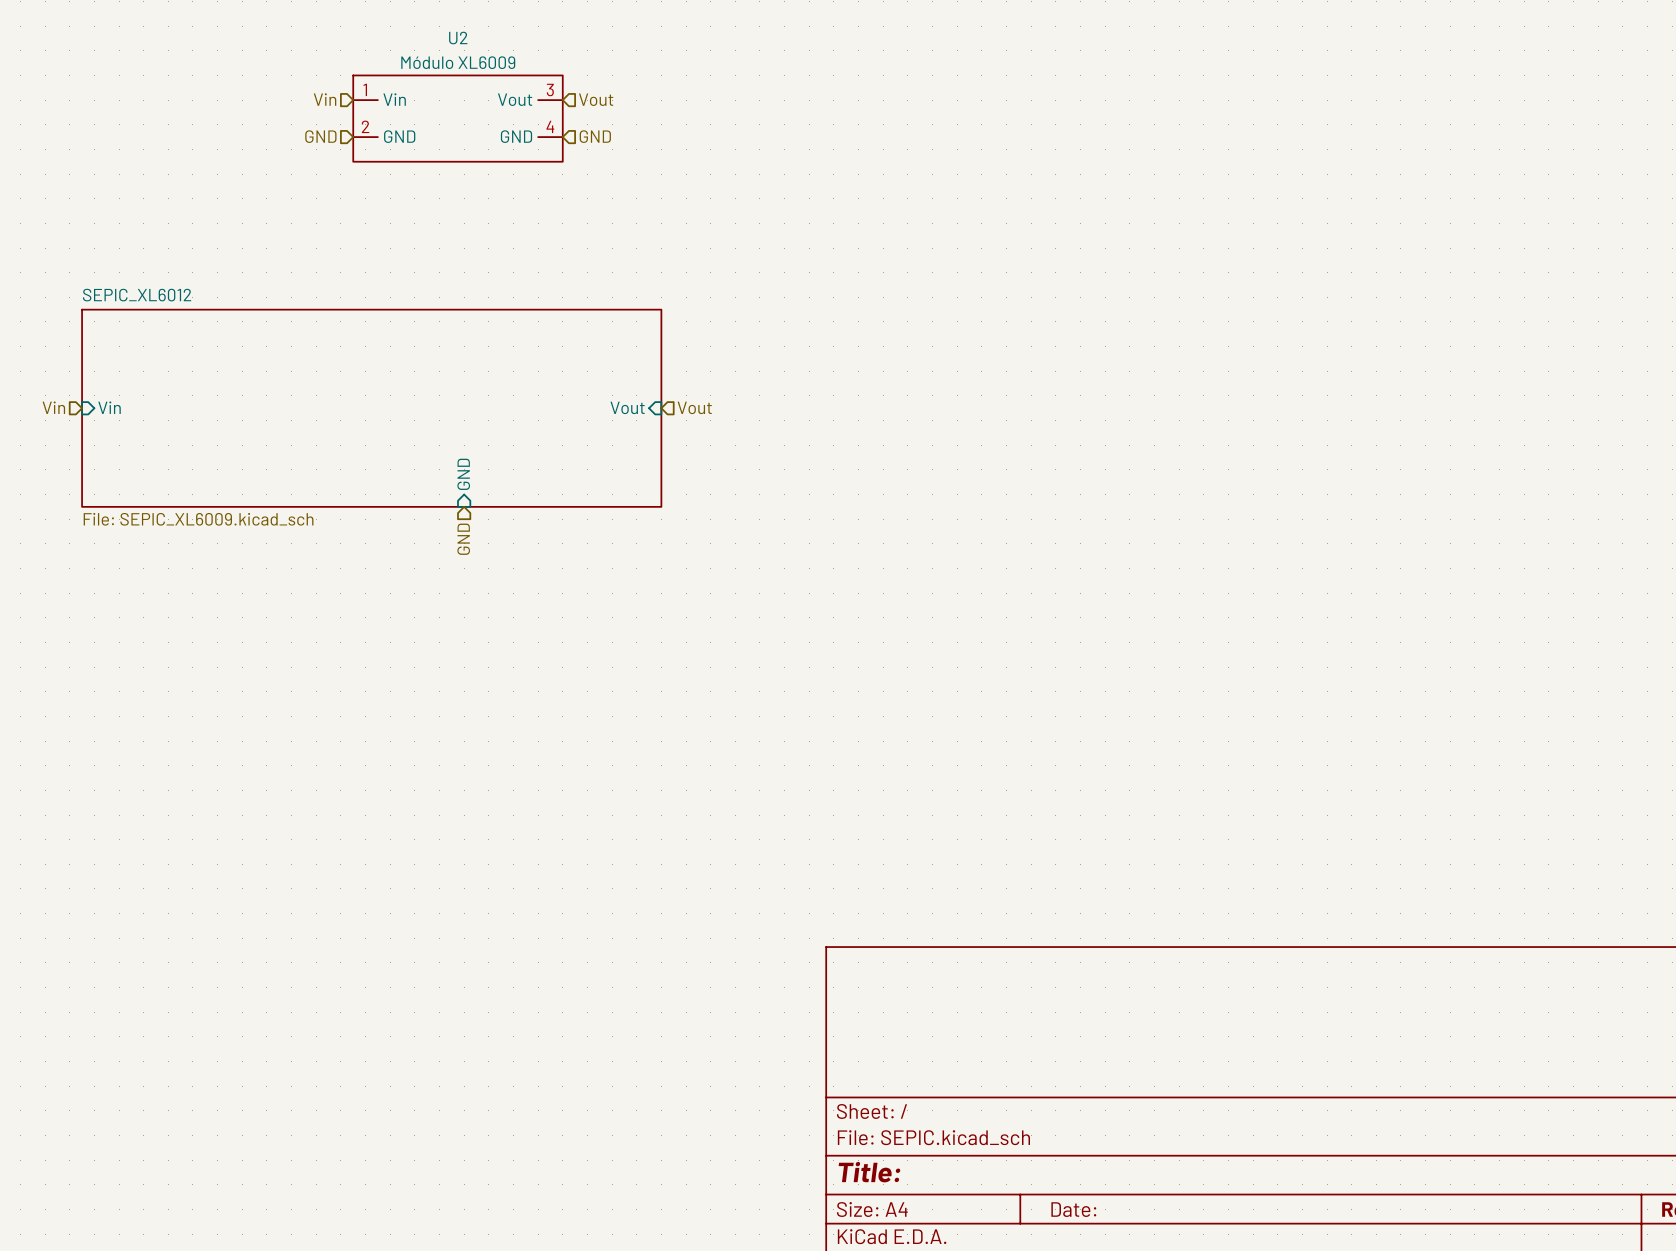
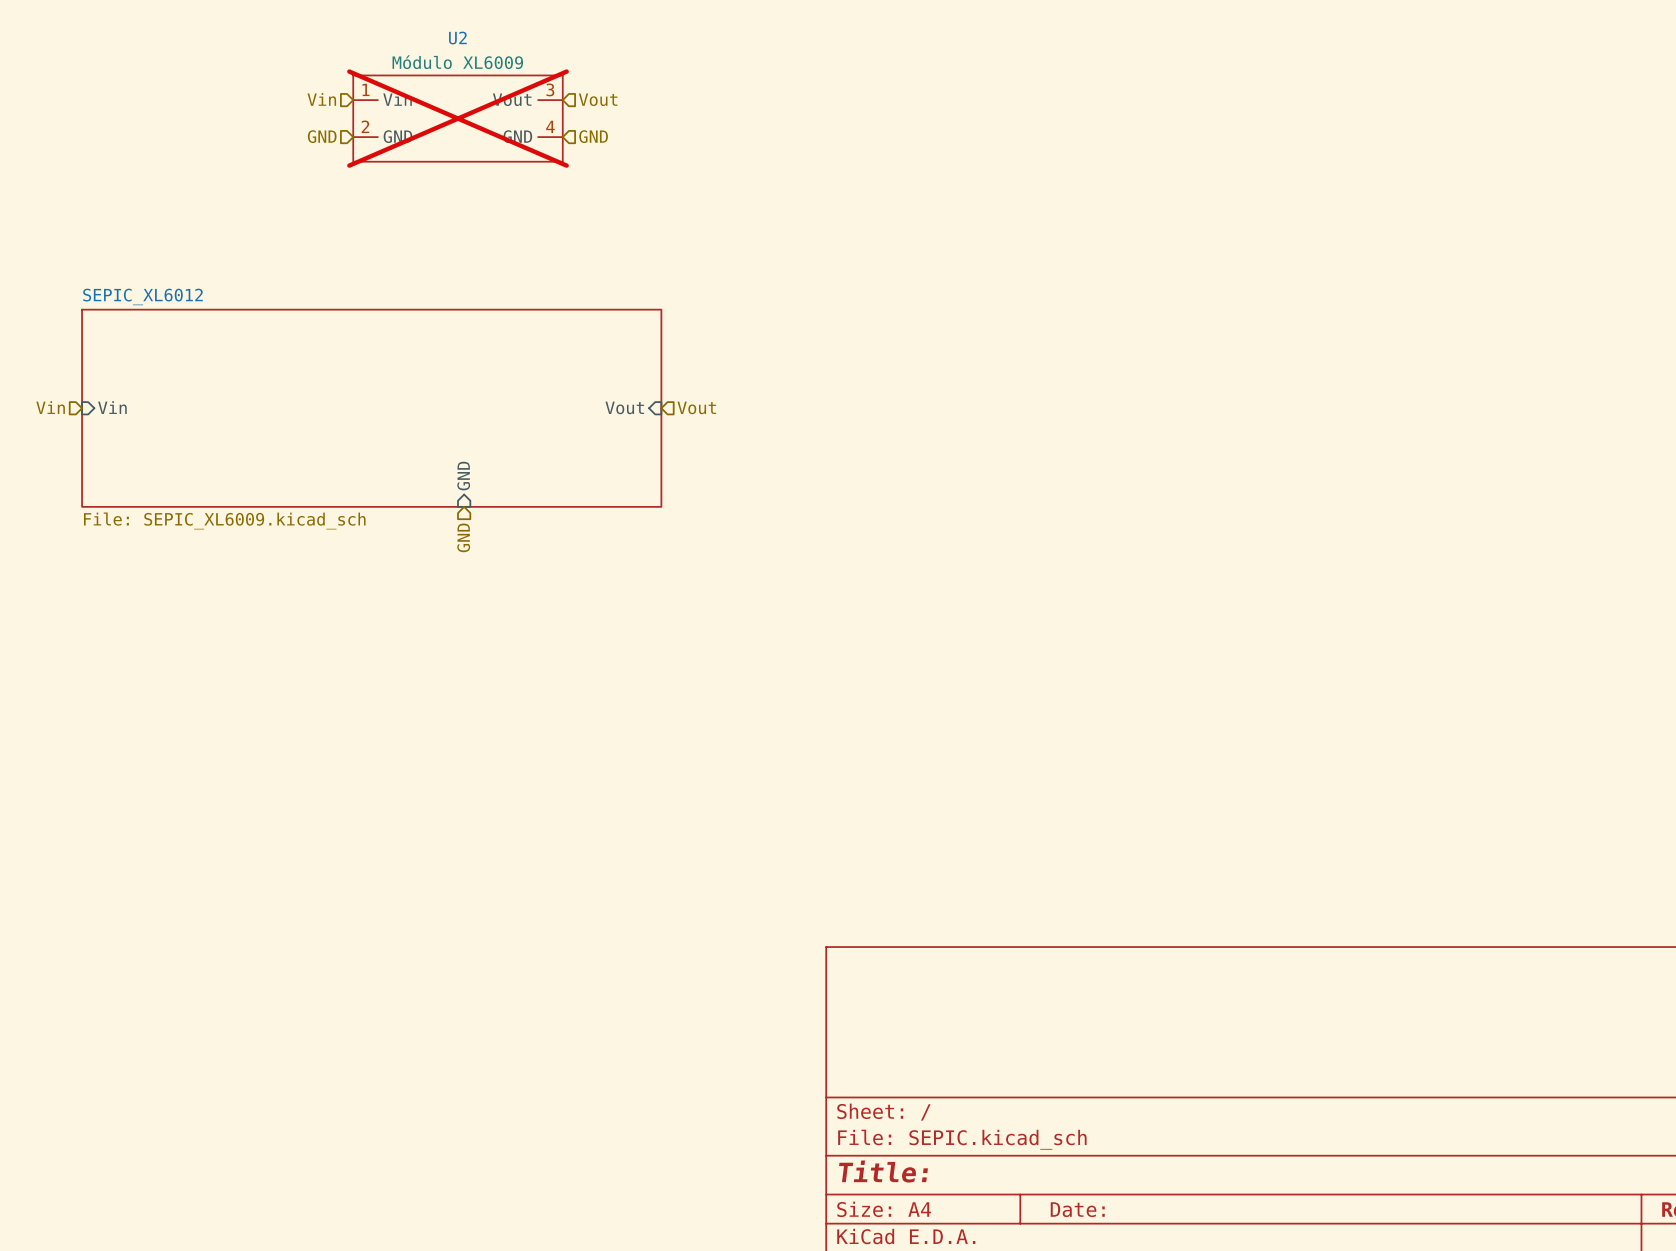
U2 do-not-place cross: none -> (458, 118)

